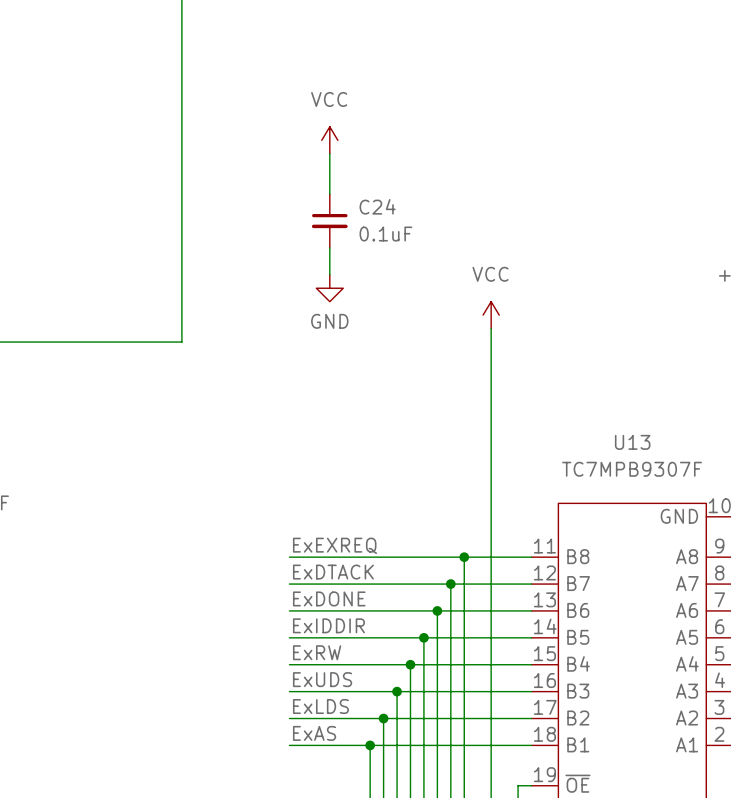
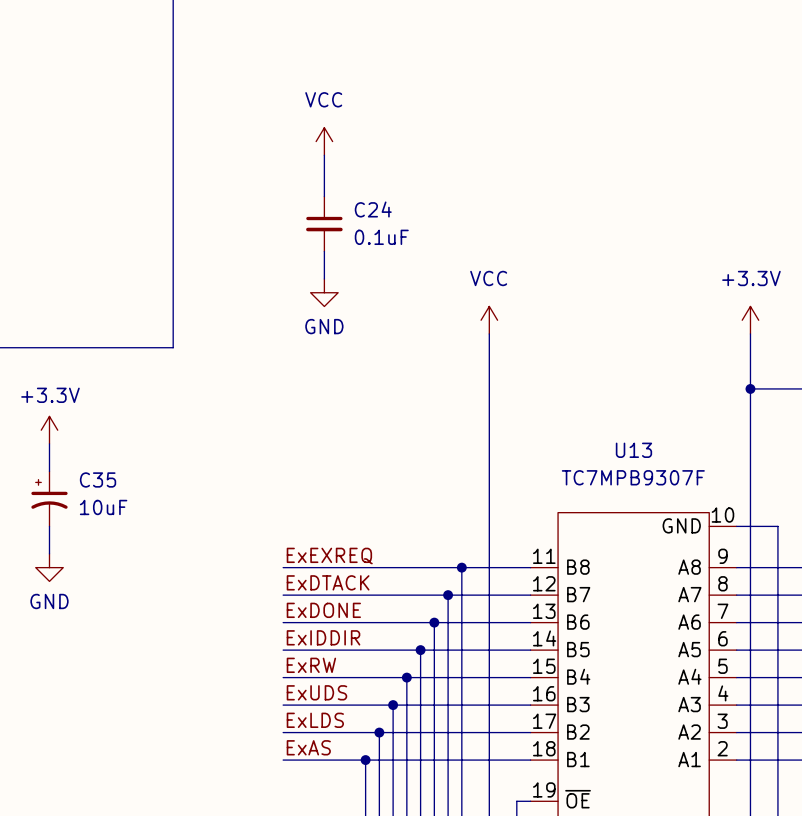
power symbol: none -> +3.3V (49, 430)
wire: none -> (49, 443) (49, 471)
C35: none -> 10uF (49, 498)
wire: none -> (49, 526) (49, 553)
power symbol: none -> GND (49, 567)

